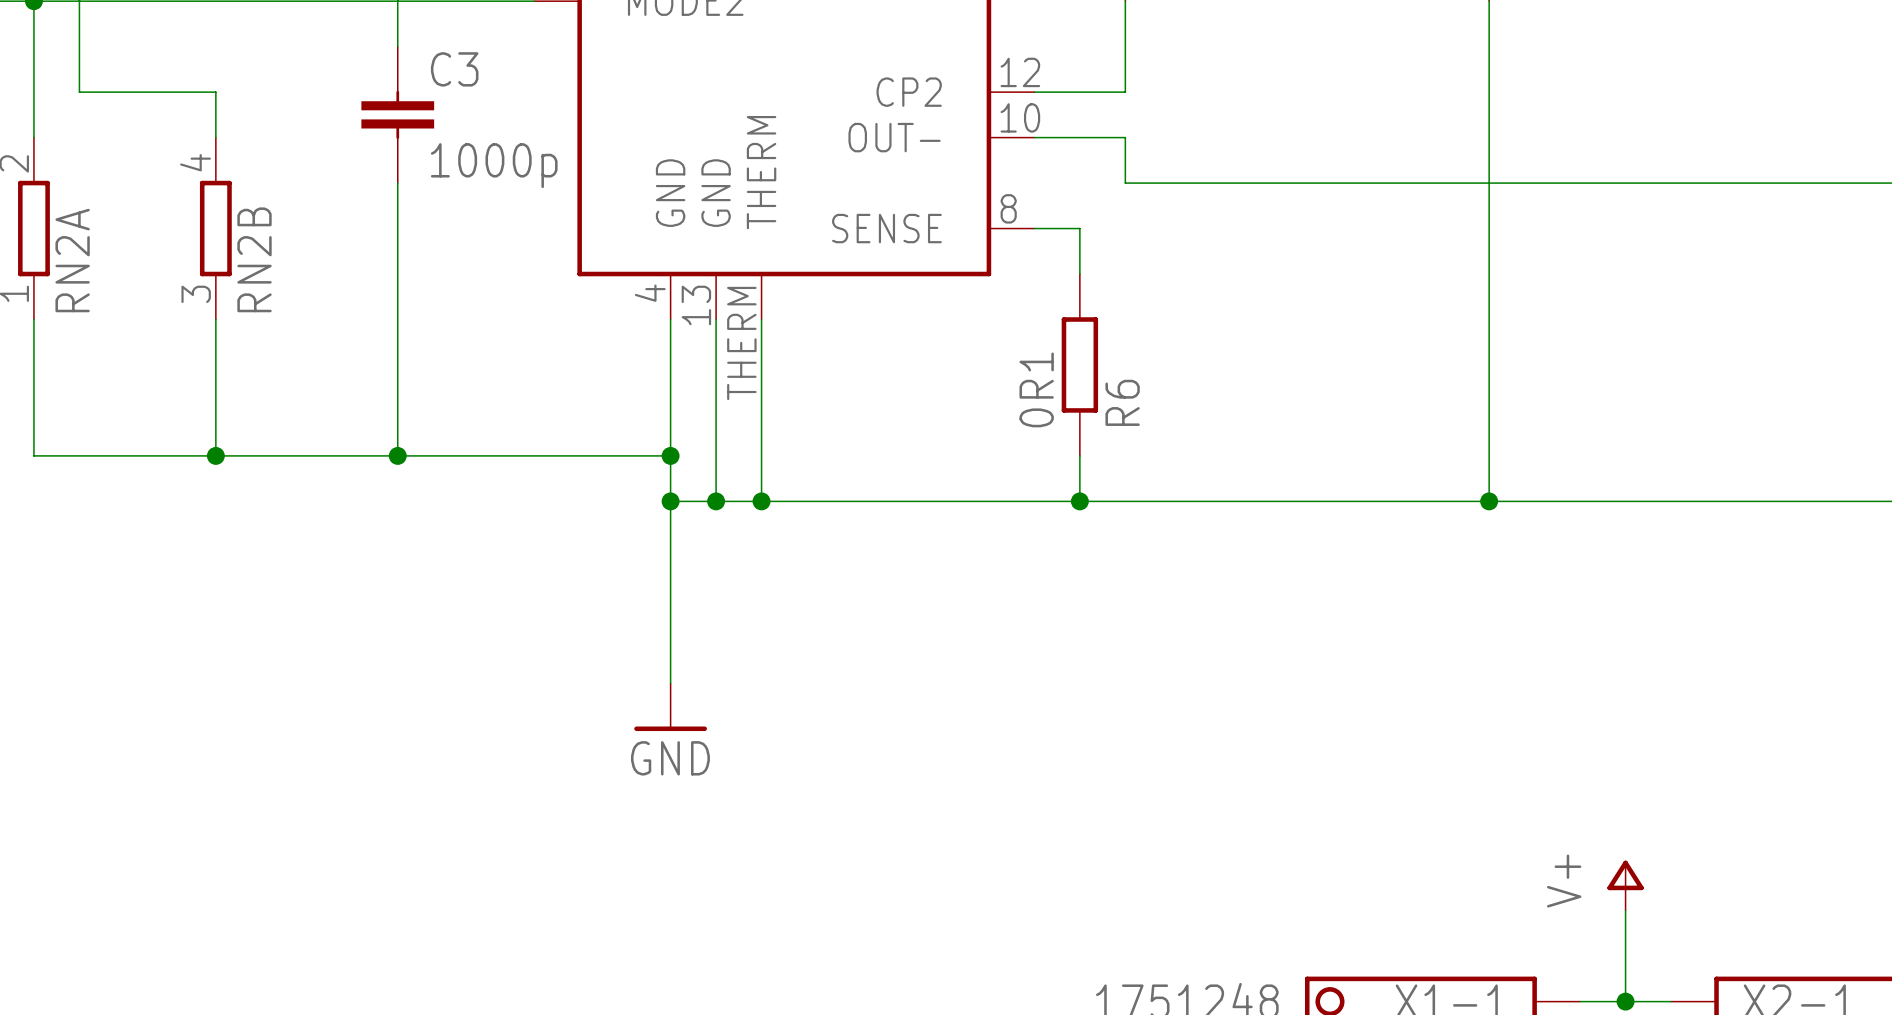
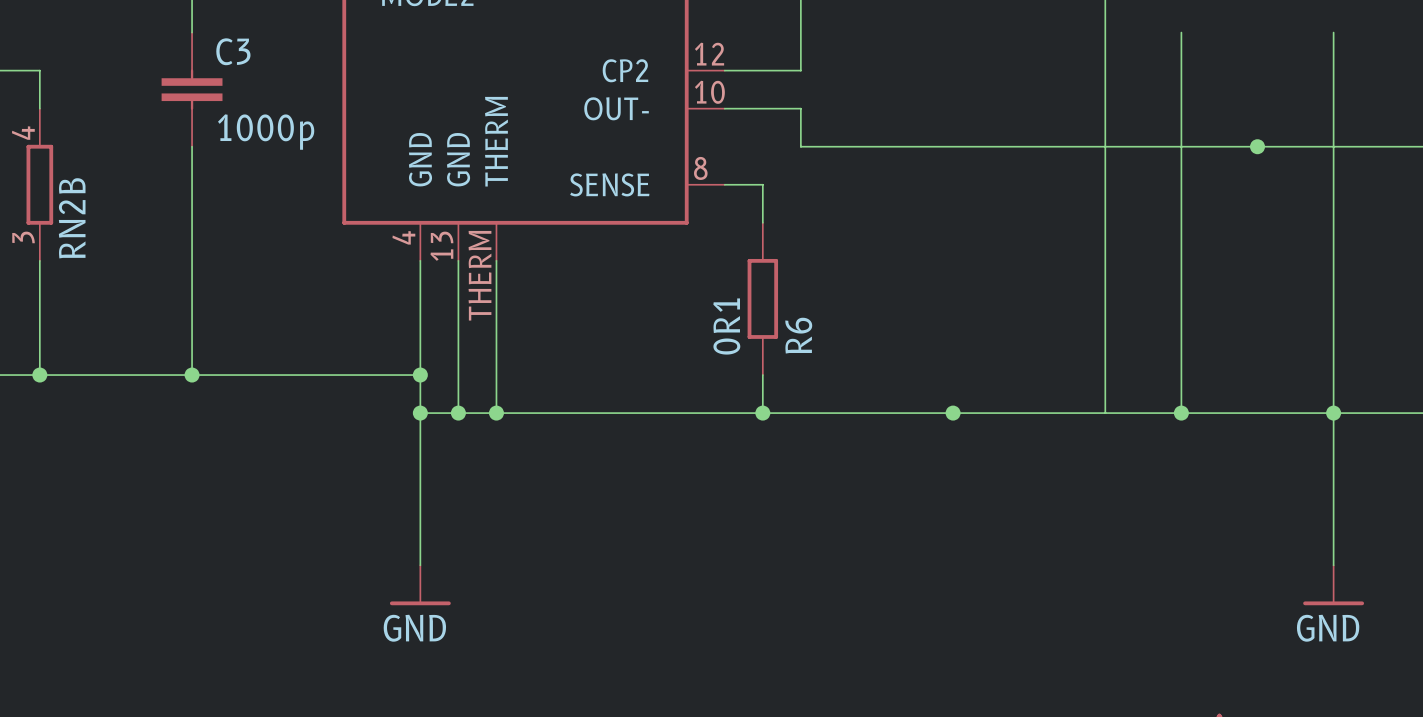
wire: none -> (1181, 32) (1181, 413)
wire: none -> (1333, 32) (1333, 565)
junction: none -> (1257, 146)
junction: none -> (953, 413)
junction: (1489, 501) -> none
junction: none -> (1181, 413)
junction: none -> (1333, 413)
power symbol: none -> GND (1333, 585)

